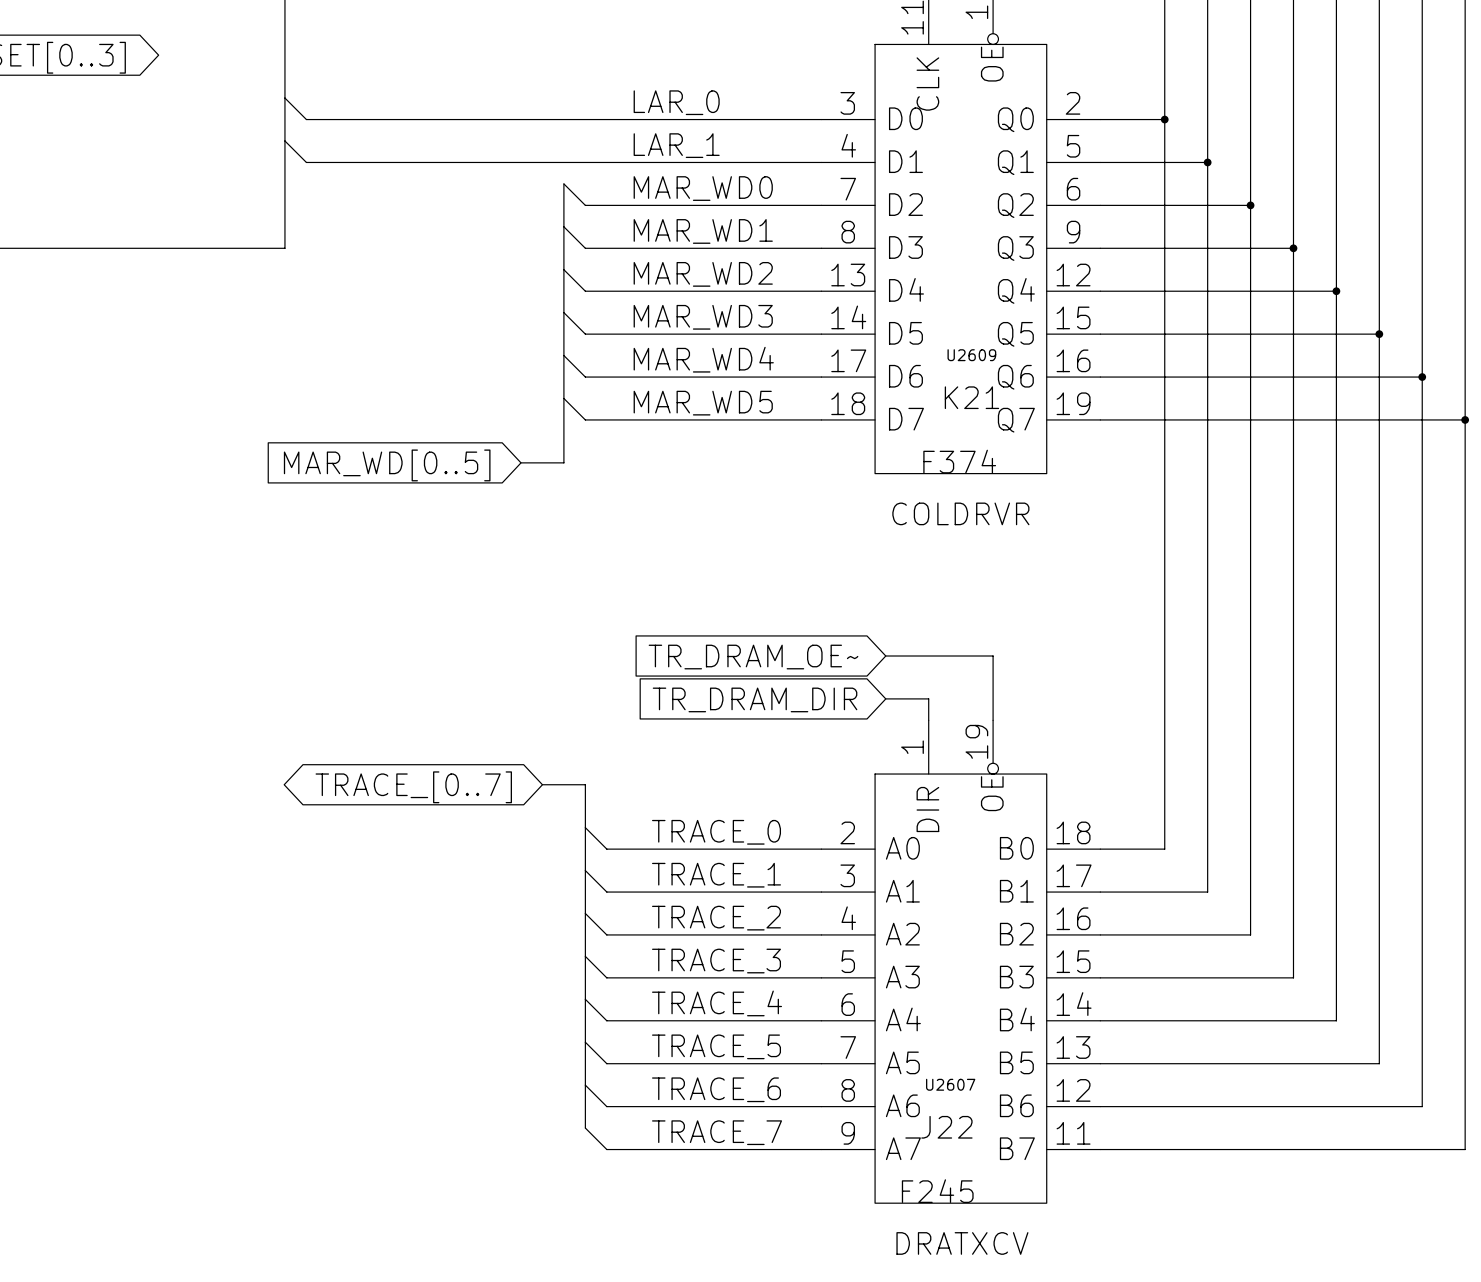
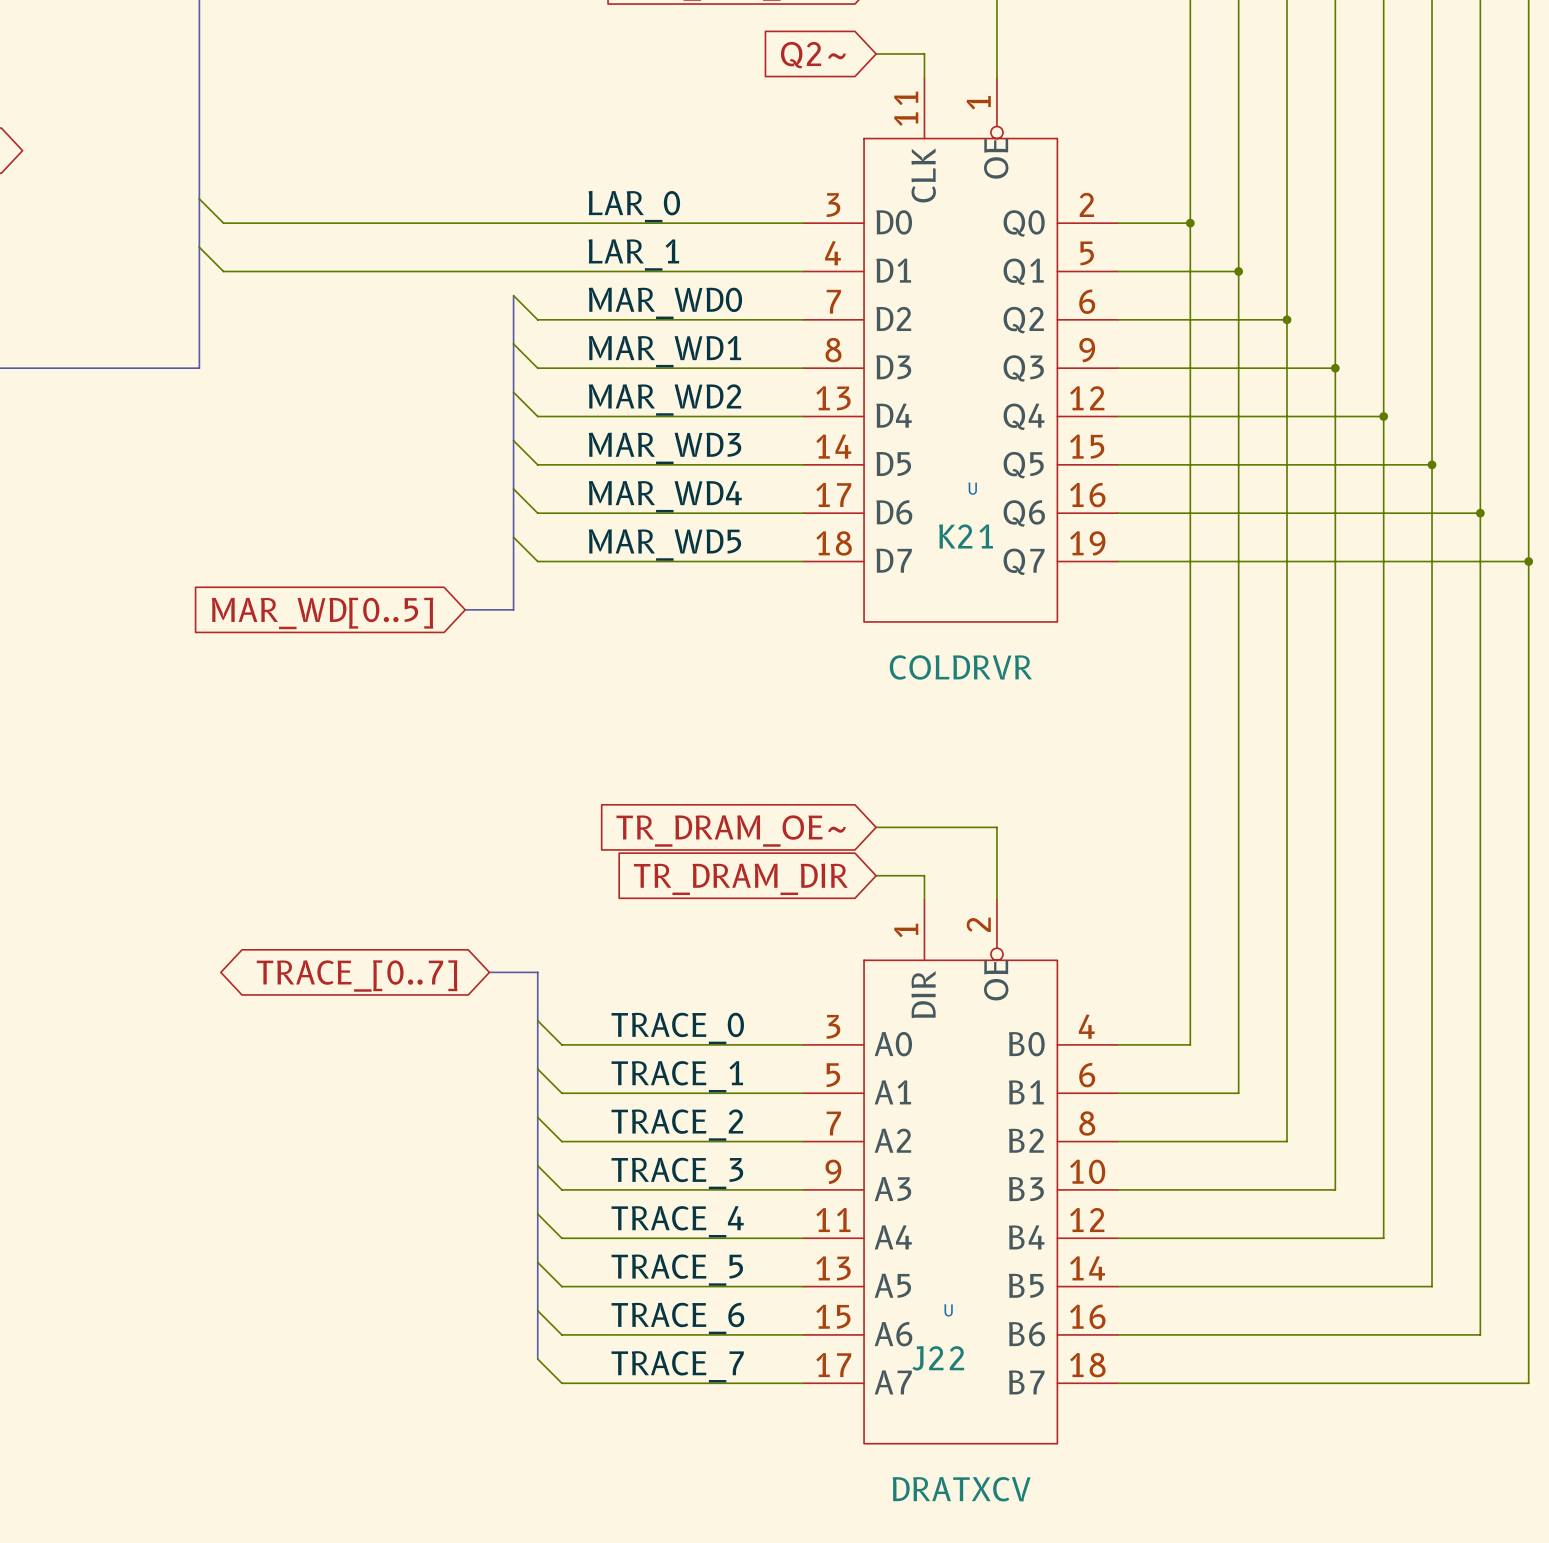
U2609 name: U2609 (971, 355) -> U (972, 488)
U2609 value: F374 (959, 461) -> none
U2607 symbol: [821, 720, 1101, 1204] -> [803, 899, 1118, 1444]
U2607 name: U2607 (950, 1084) -> U (948, 1310)
U2607 value: F245 (937, 1191) -> none

